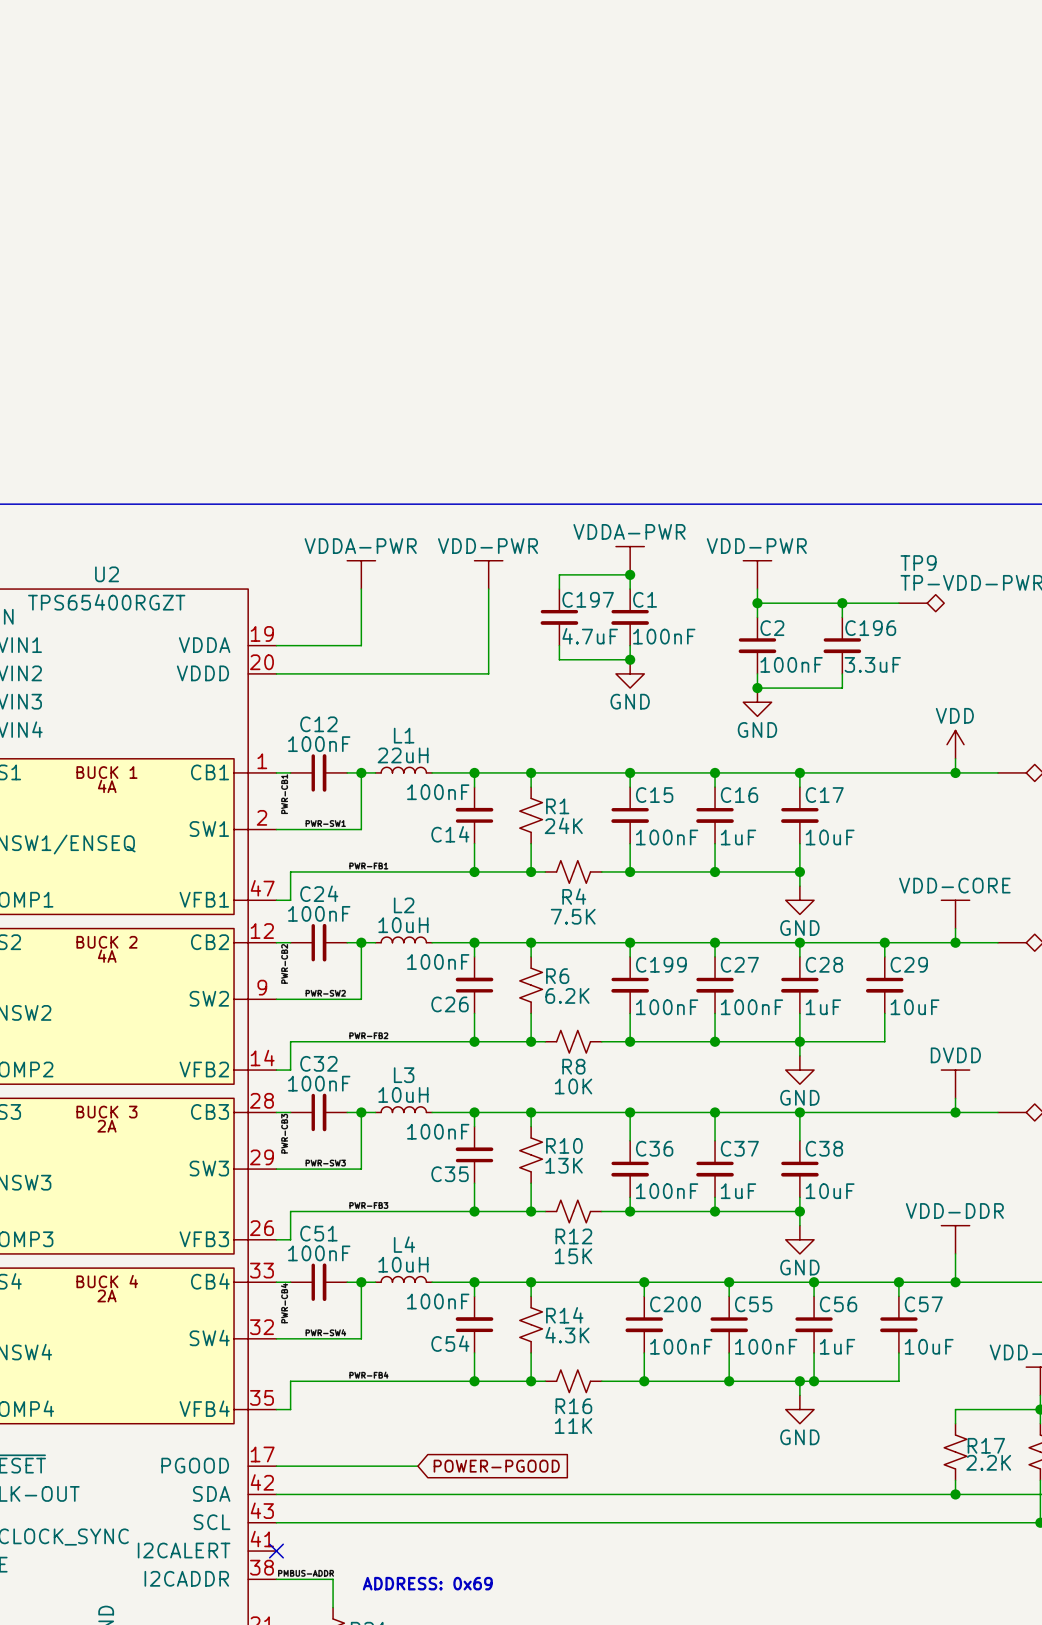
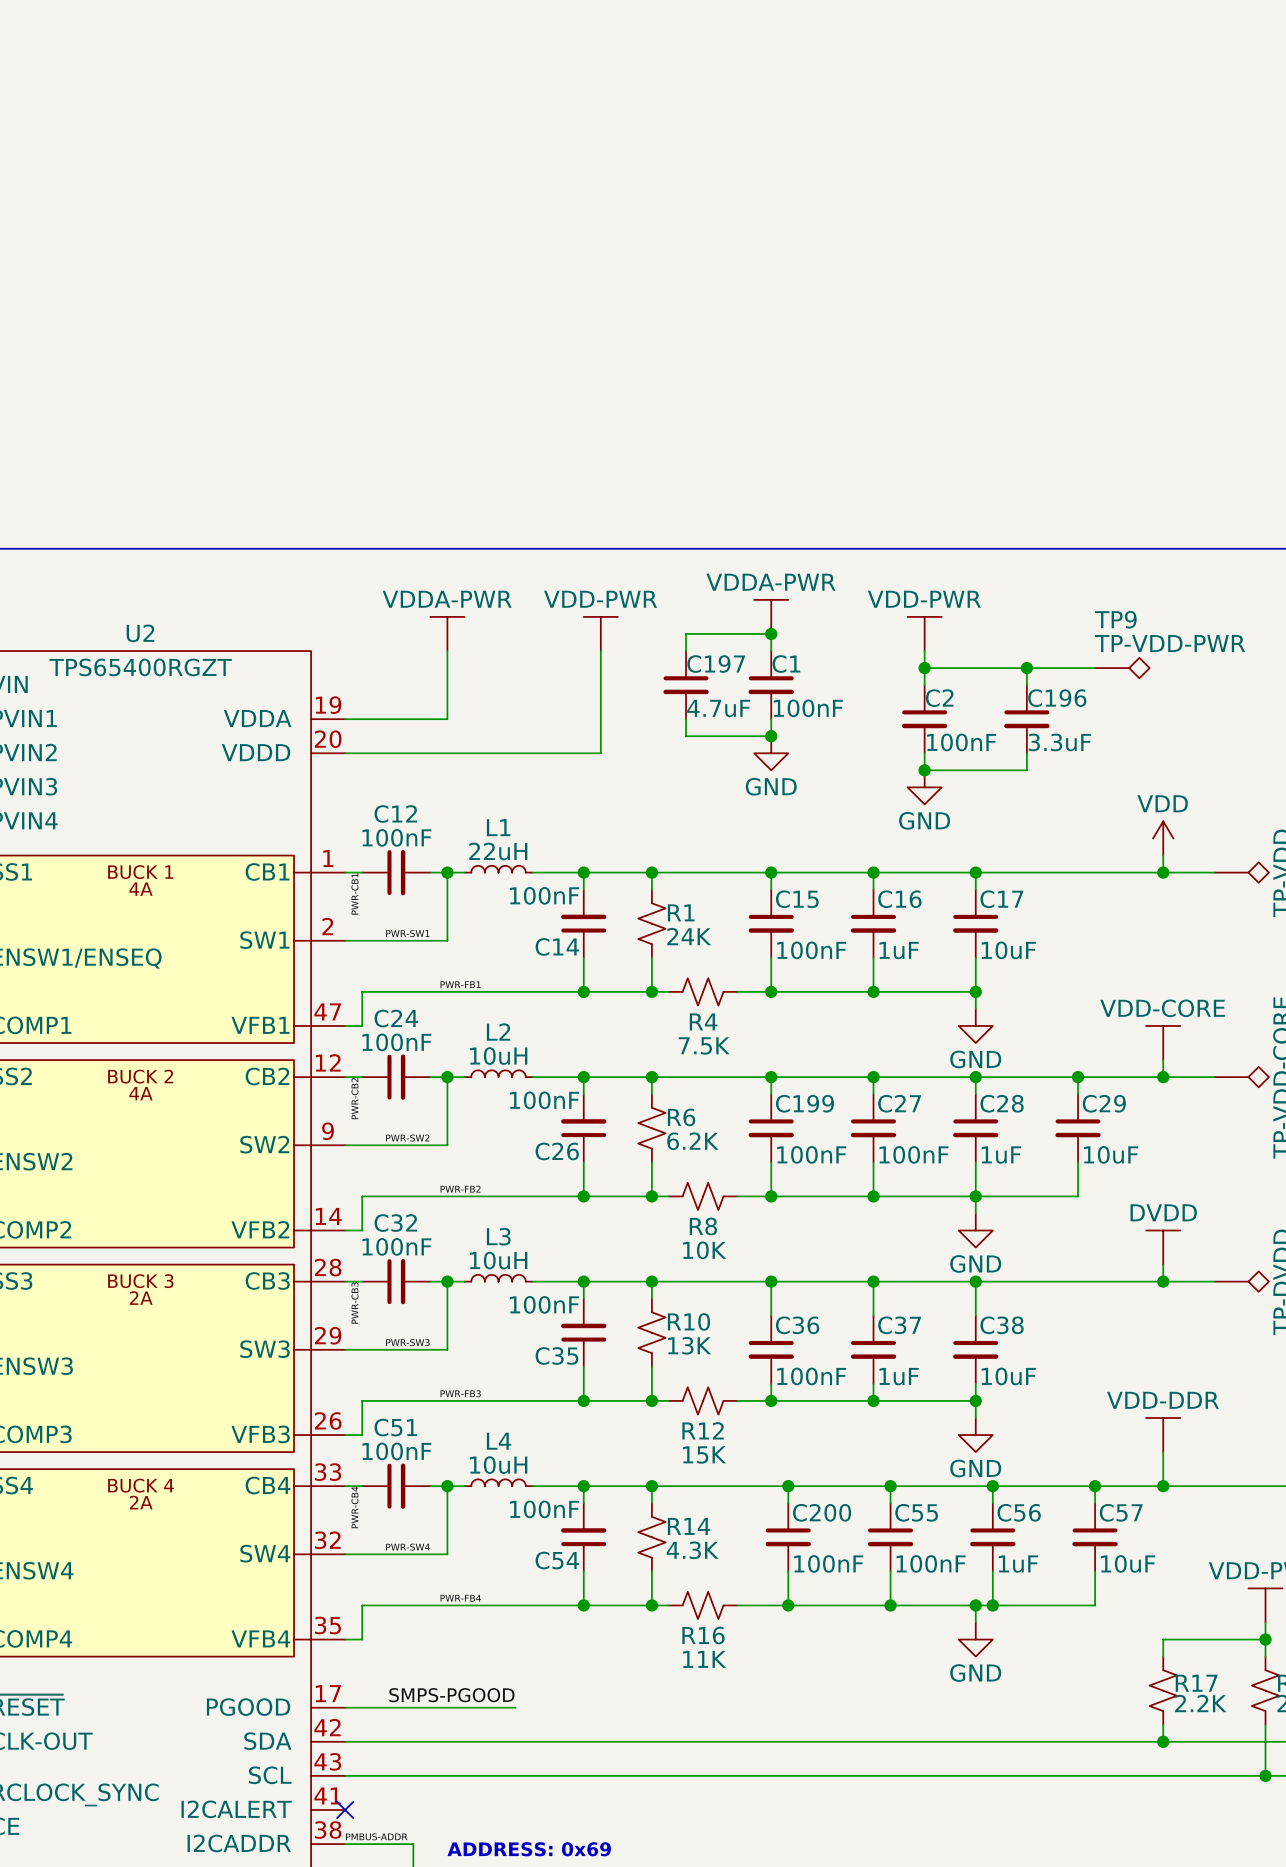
label: none -> SMPS-PGOOD (451, 1695)
global label: POWER-PGOOD (496, 1466) -> none

